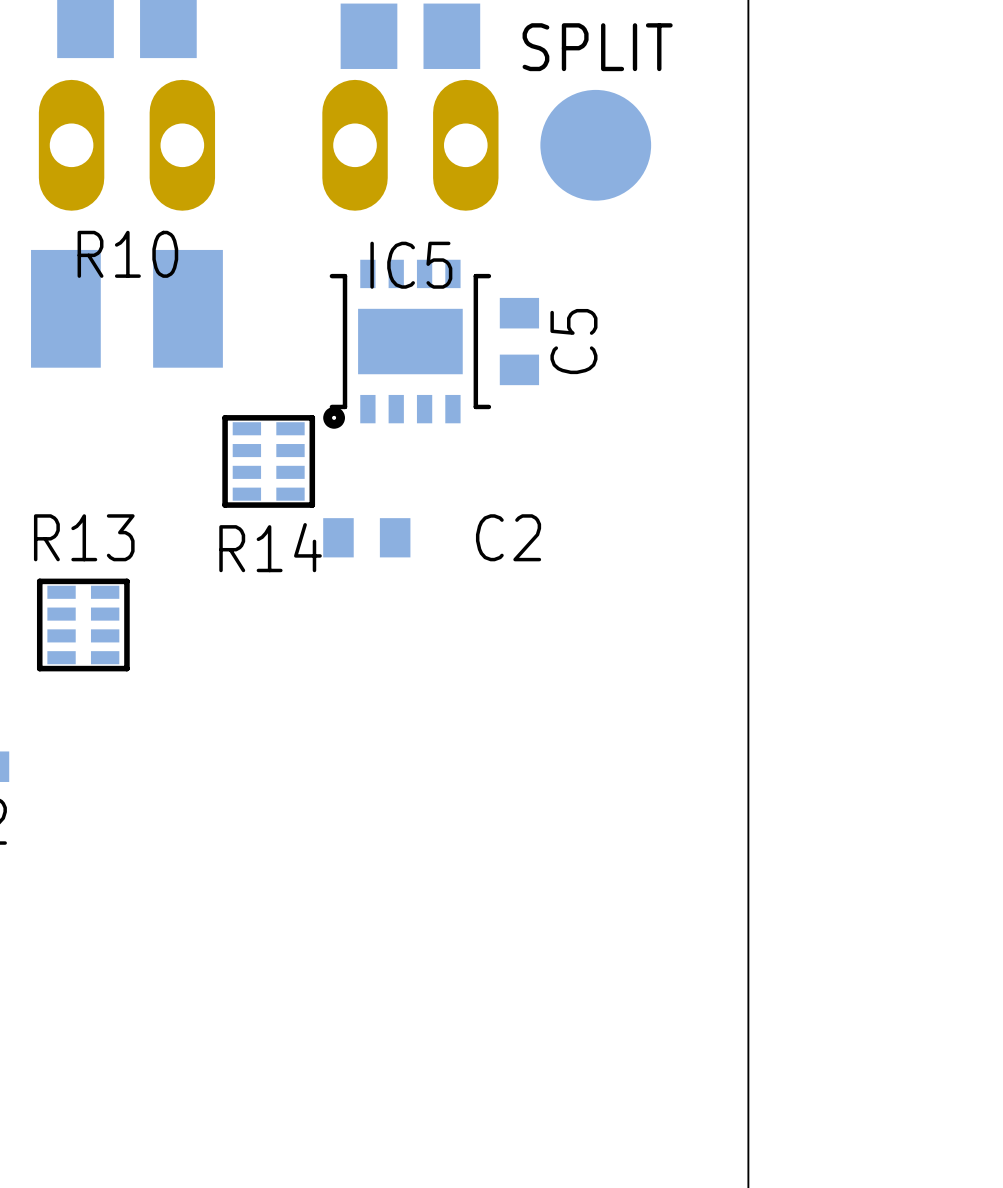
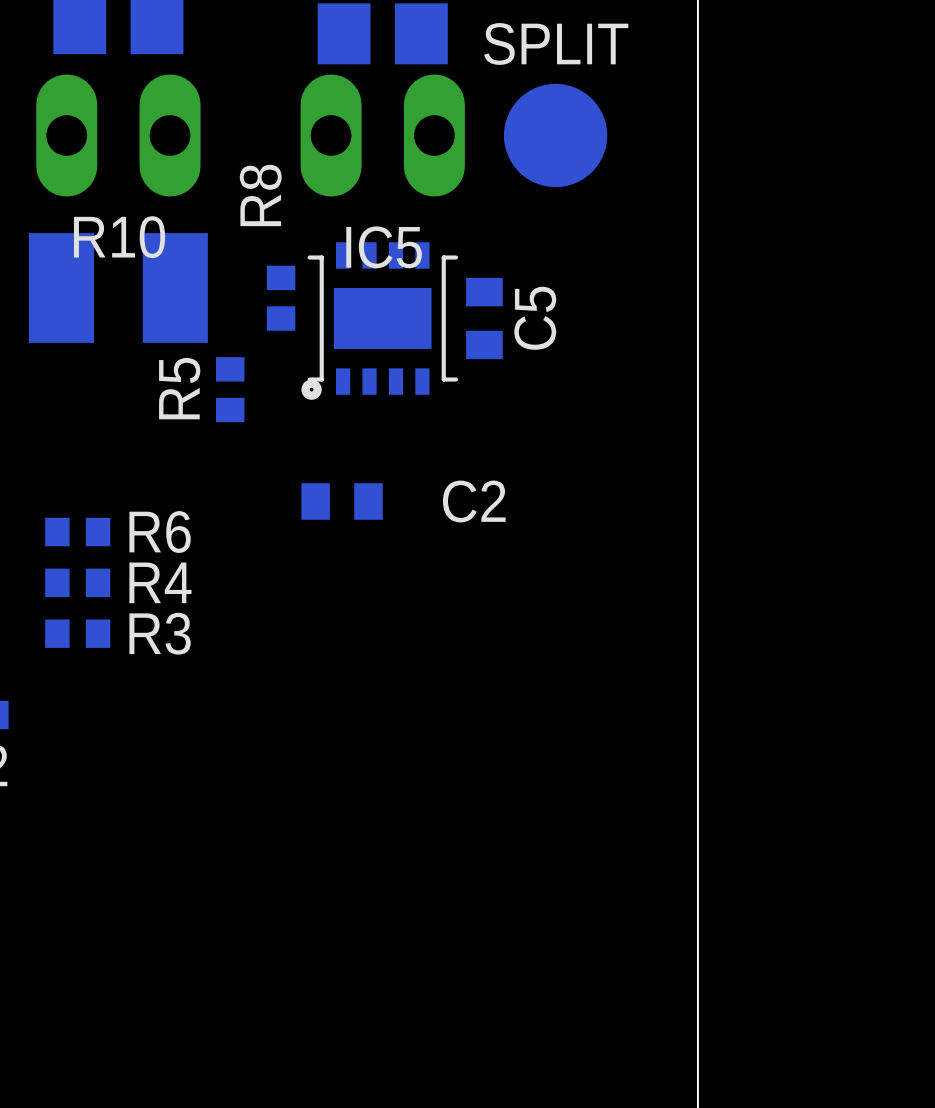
R8: none -> (281, 298)
R5: none -> (230, 389)
R14: (268, 461) -> none
R6: none -> (77, 532)
R13: (83, 624) -> none
R4: none -> (77, 582)
R3: none -> (77, 633)

